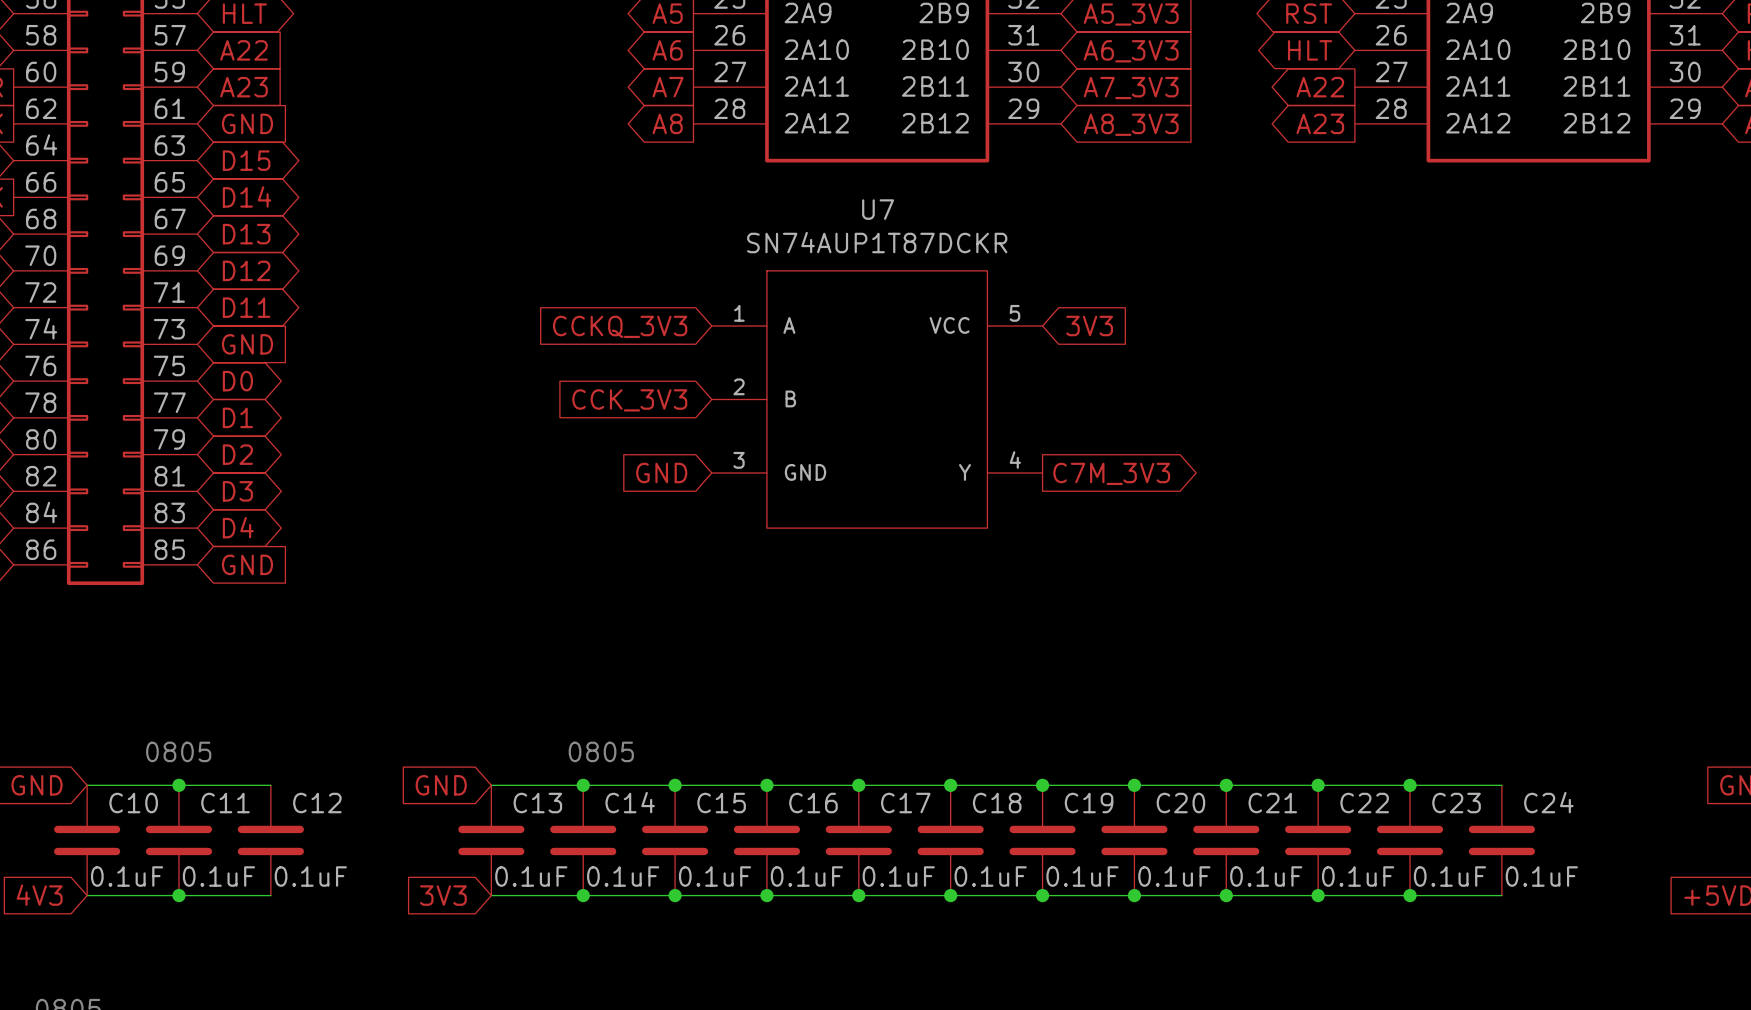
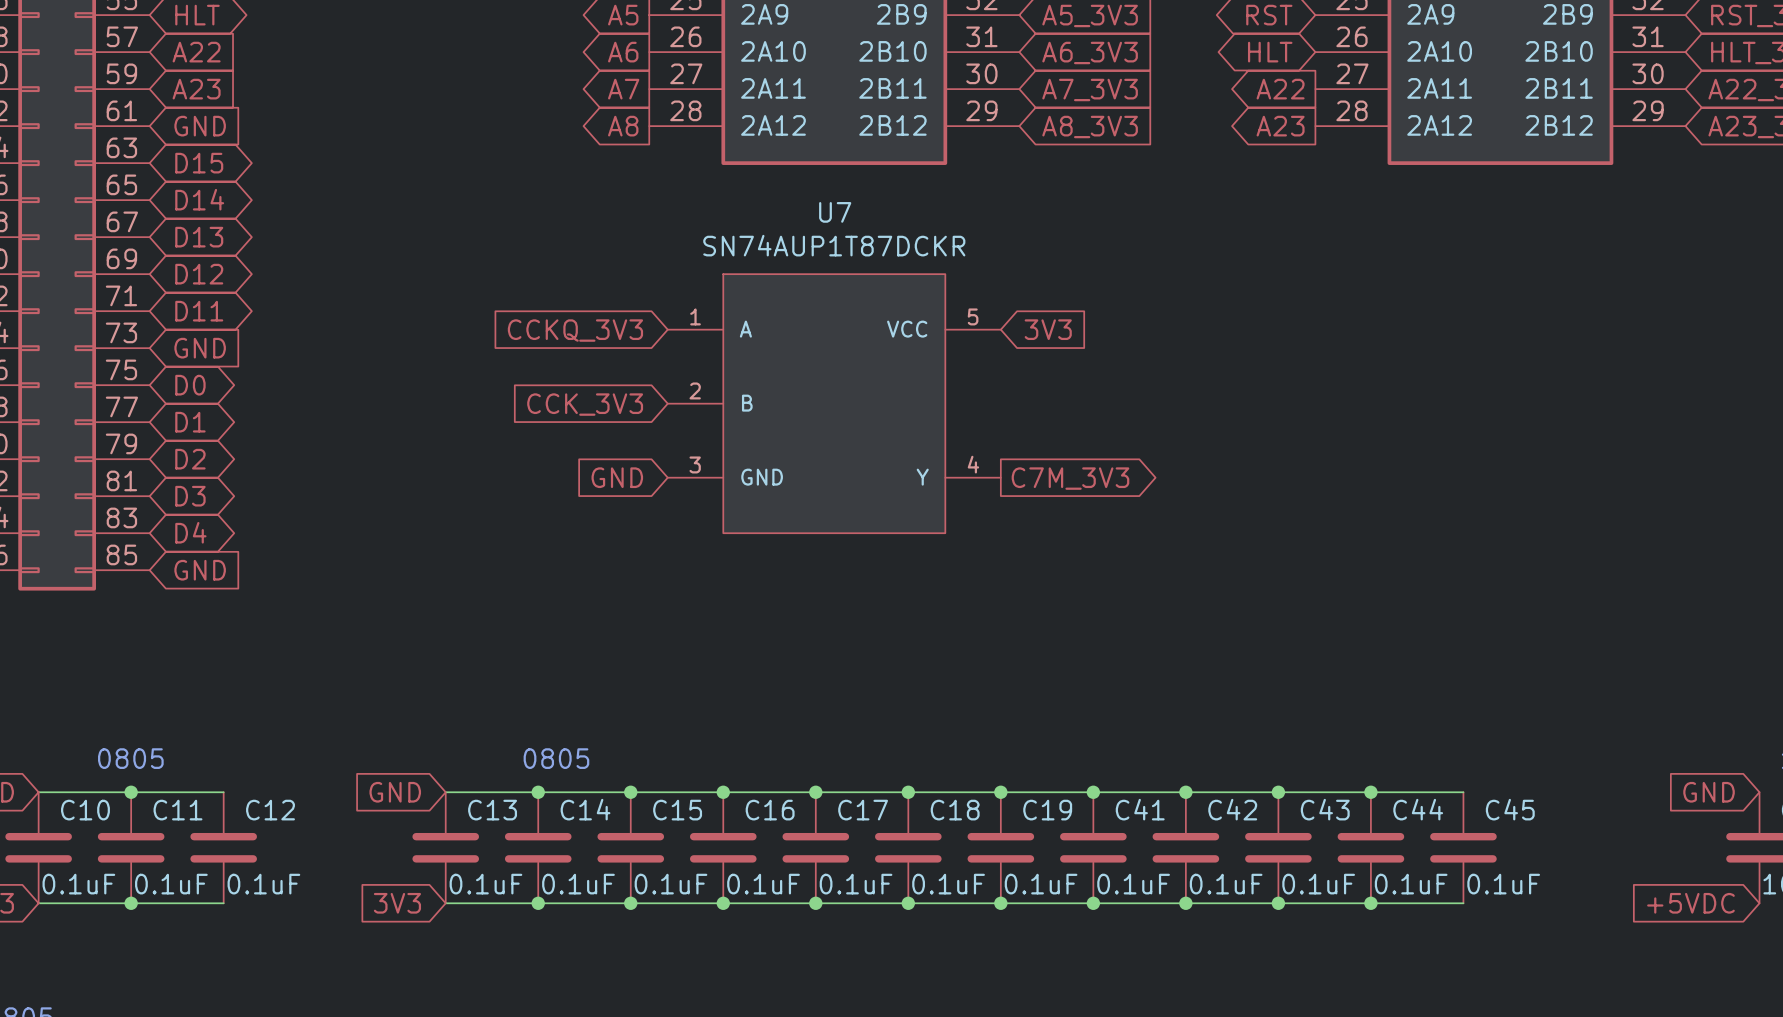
C24 name: C24 (1548, 802) -> C45 (1510, 809)
C20 name: C20 (1180, 803) -> C41 (1140, 809)
C21 name: C21 (1272, 803) -> C42 (1232, 809)
C22 name: C22 (1364, 803) -> C43 (1325, 809)
C23 name: C23 (1456, 803) -> C44 (1418, 809)

